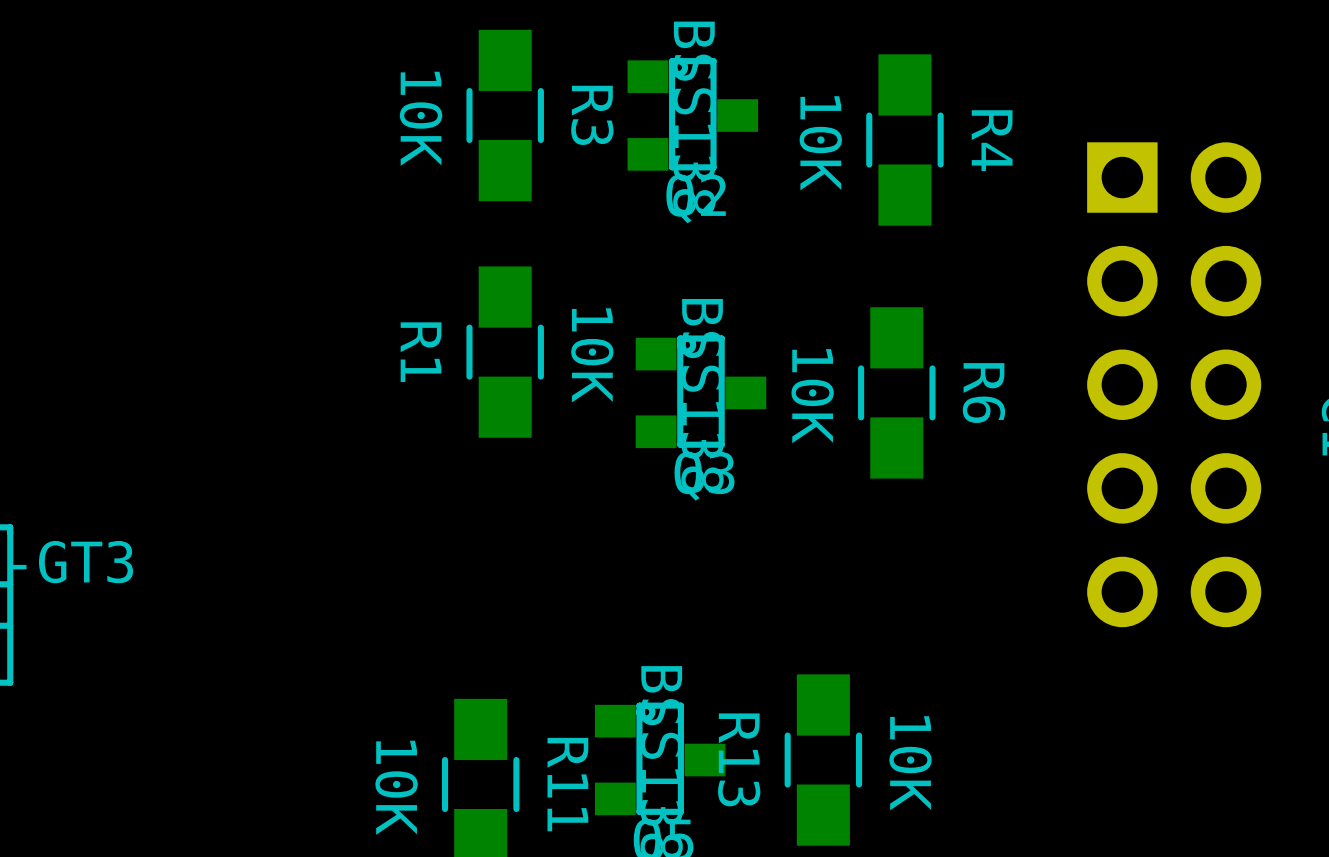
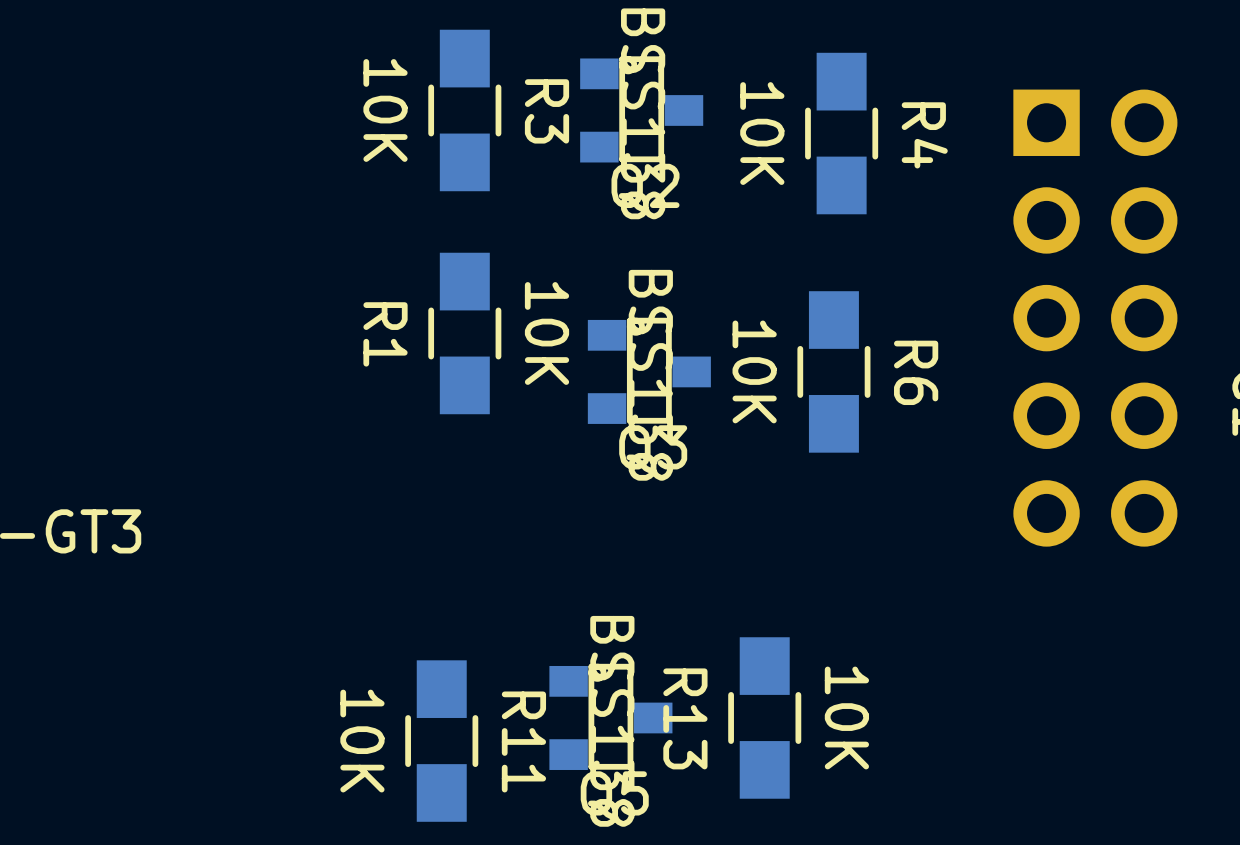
part position: (1174, 384) -> (1095, 318)

